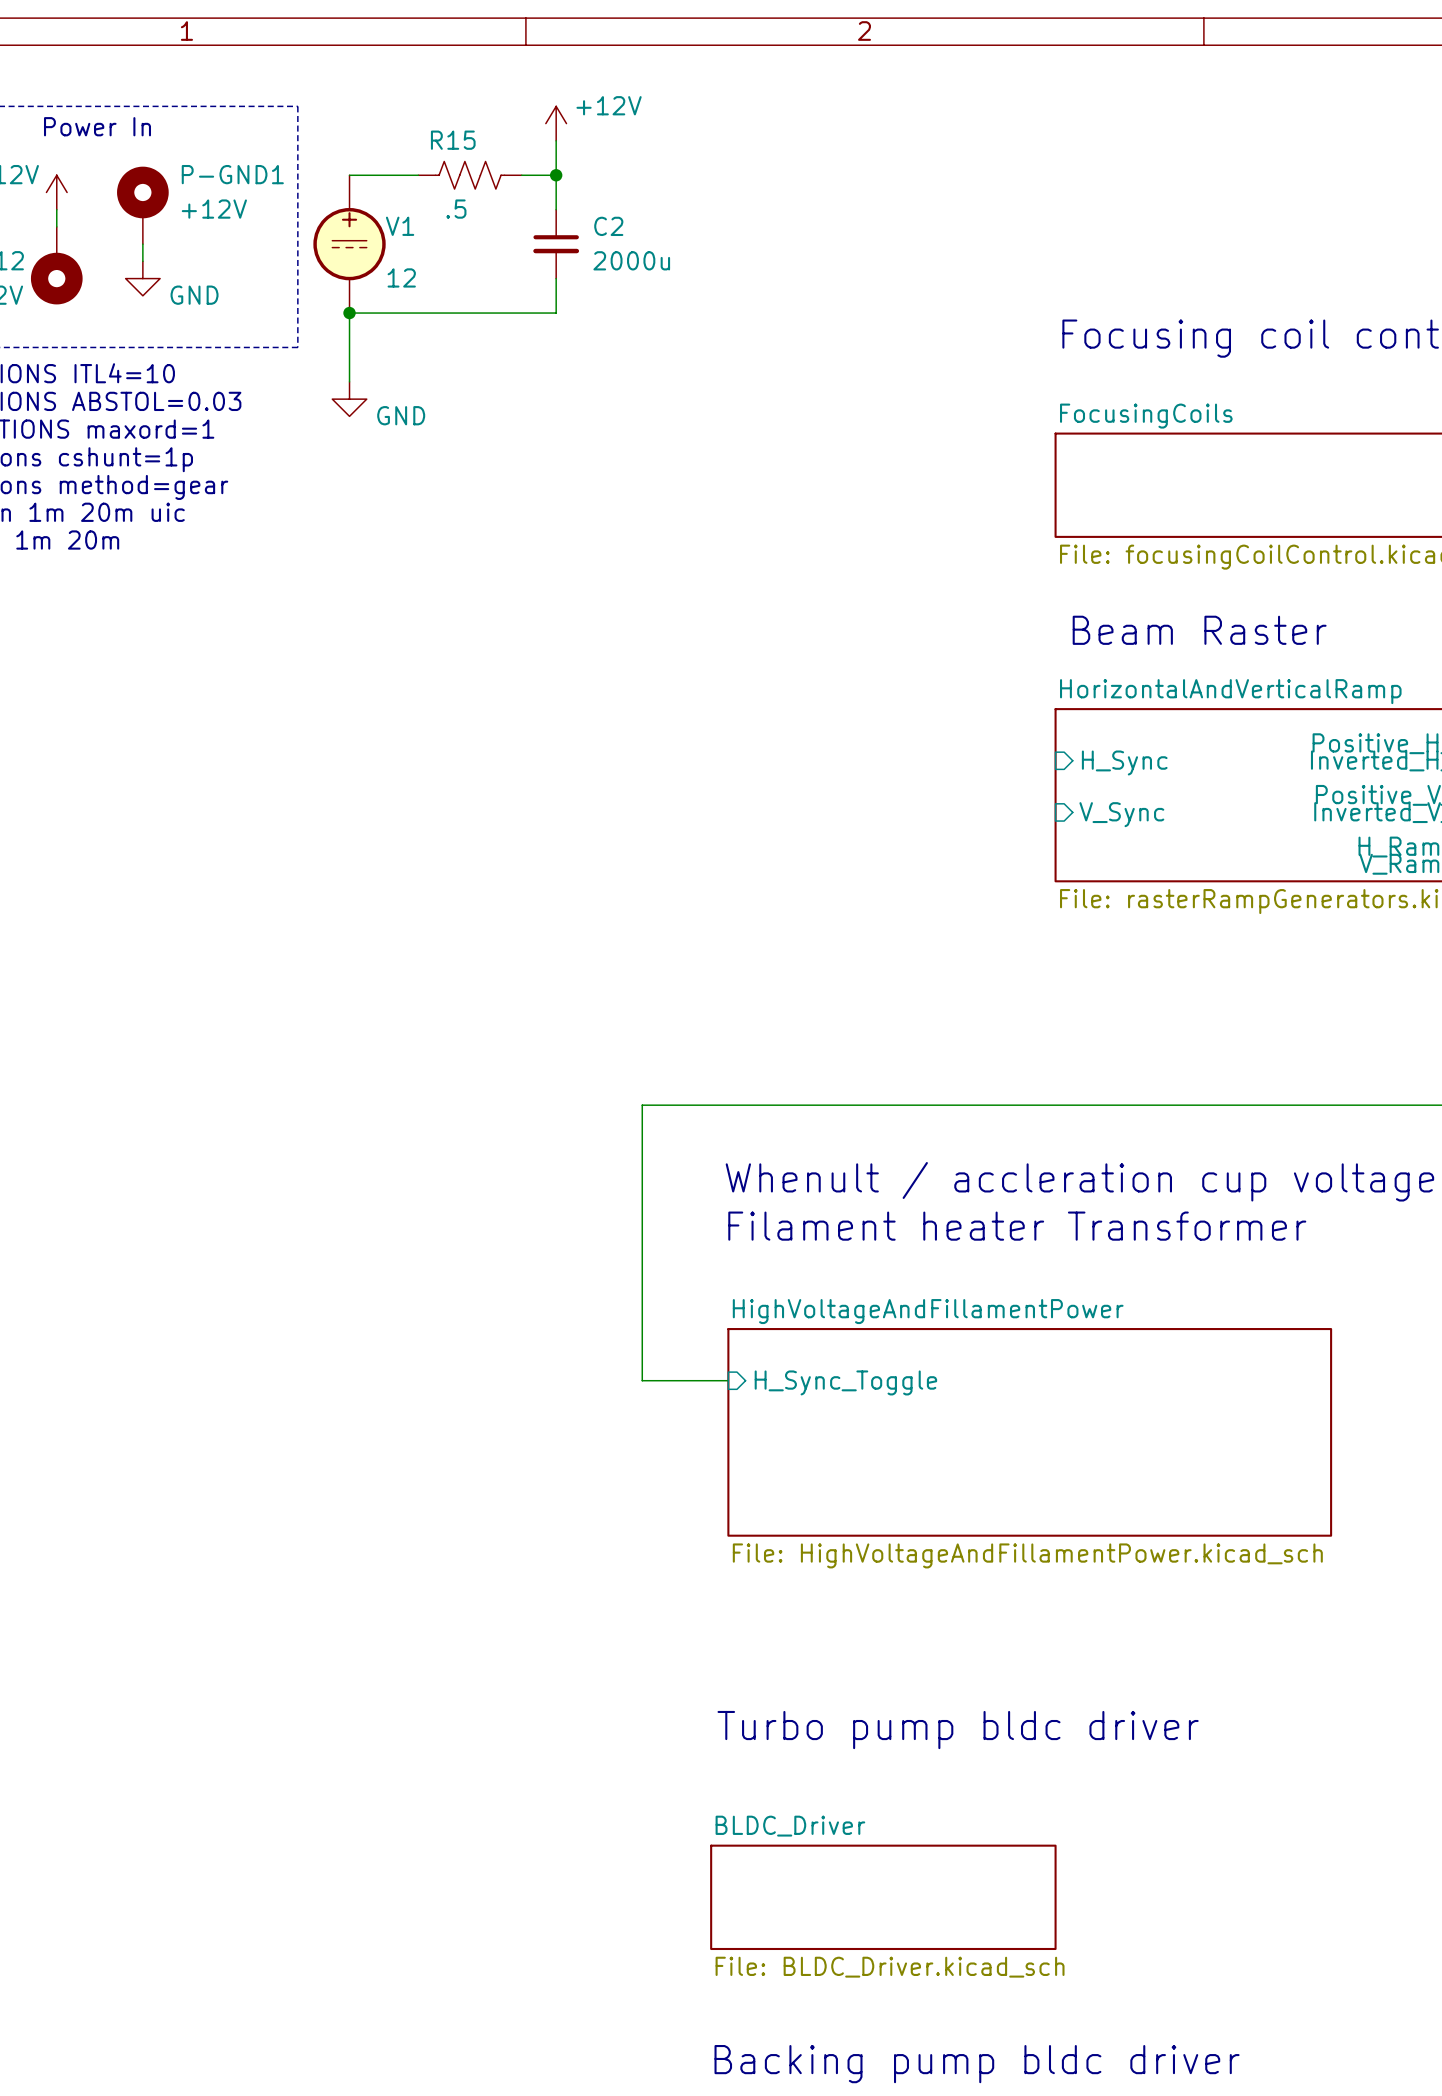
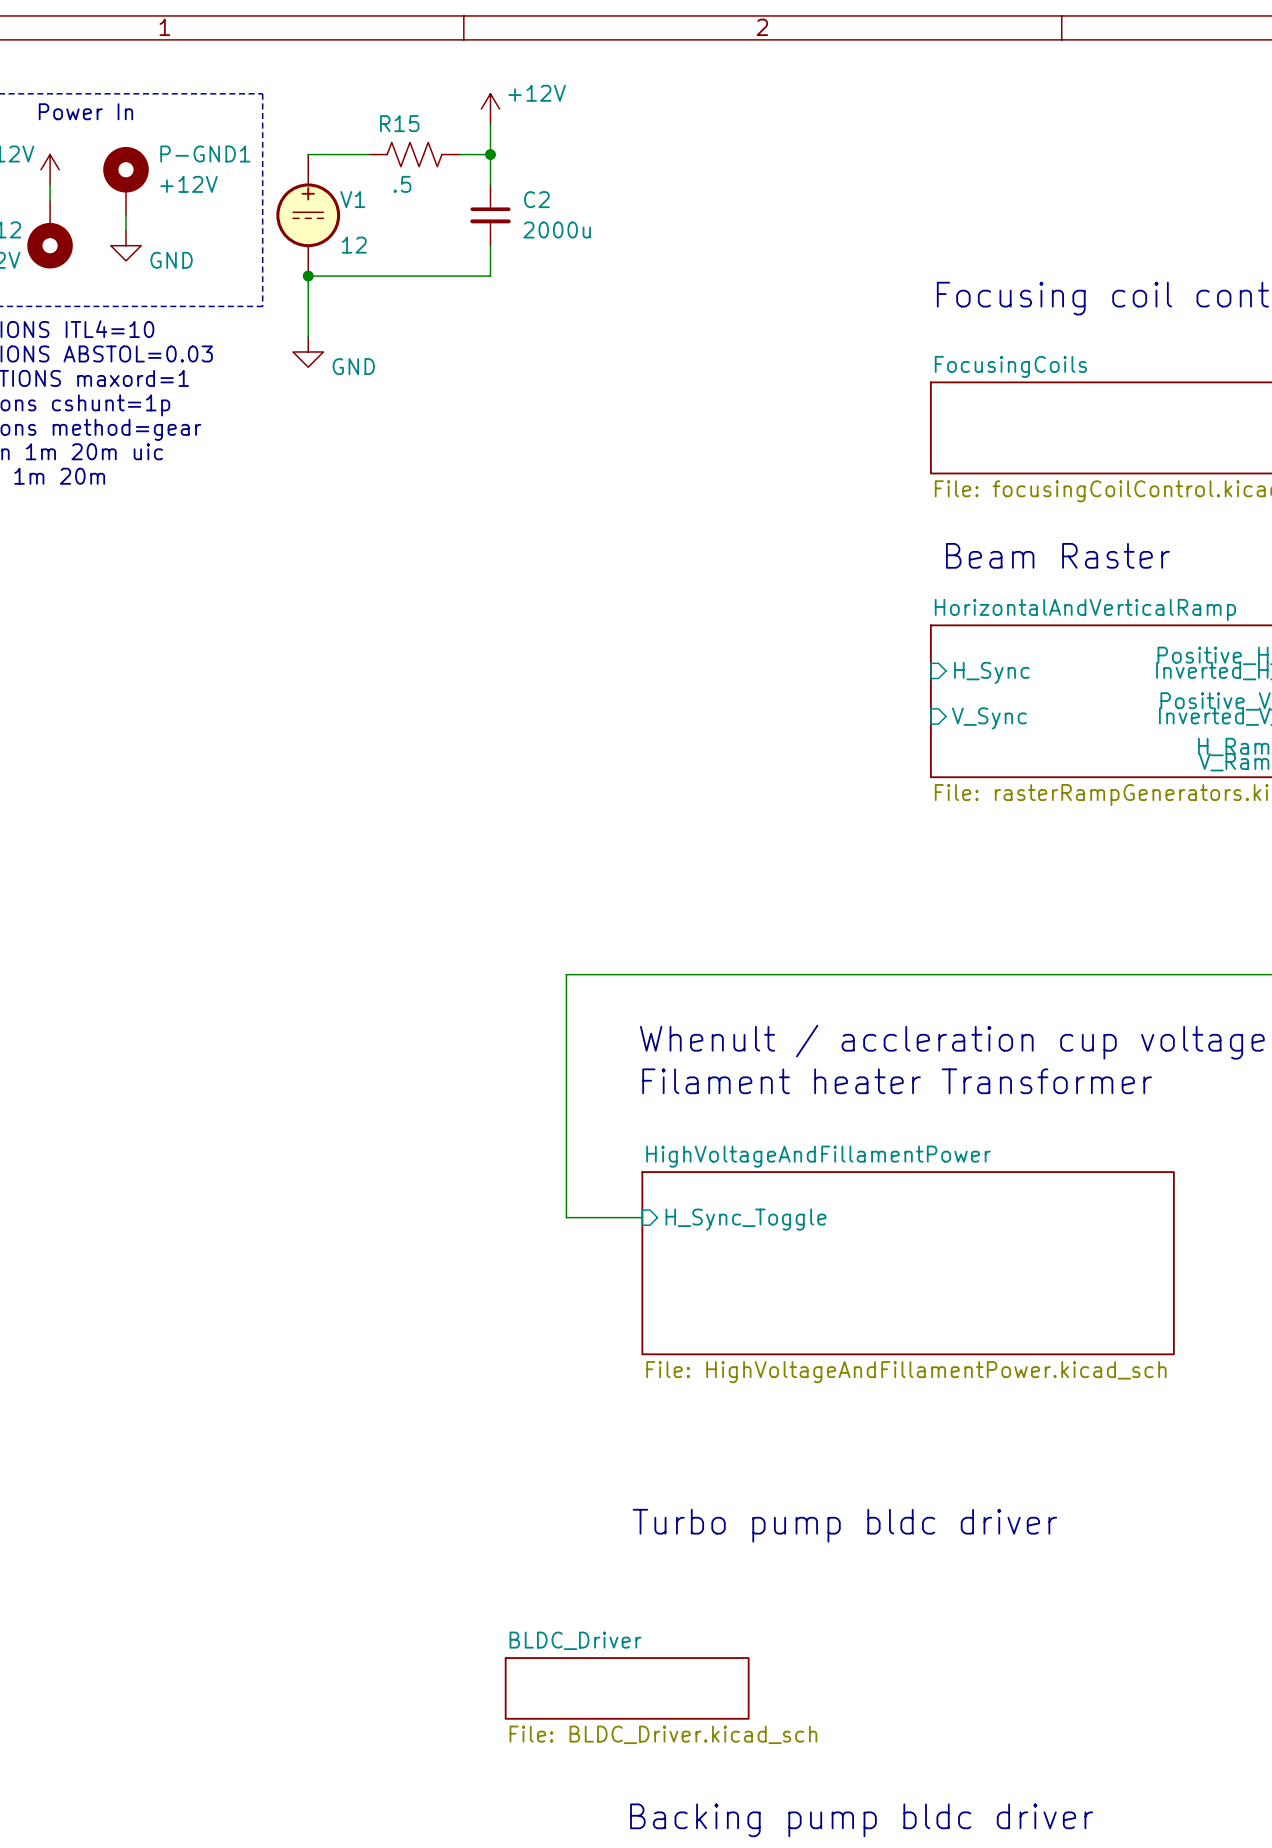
sheet BLDC_Driver: File: BLDC_Driver.kicad_sch (883, 1897) -> none
sheet BLDC_Driver: none -> File: BLDC_Driver.kicad_sch (627, 1688)

